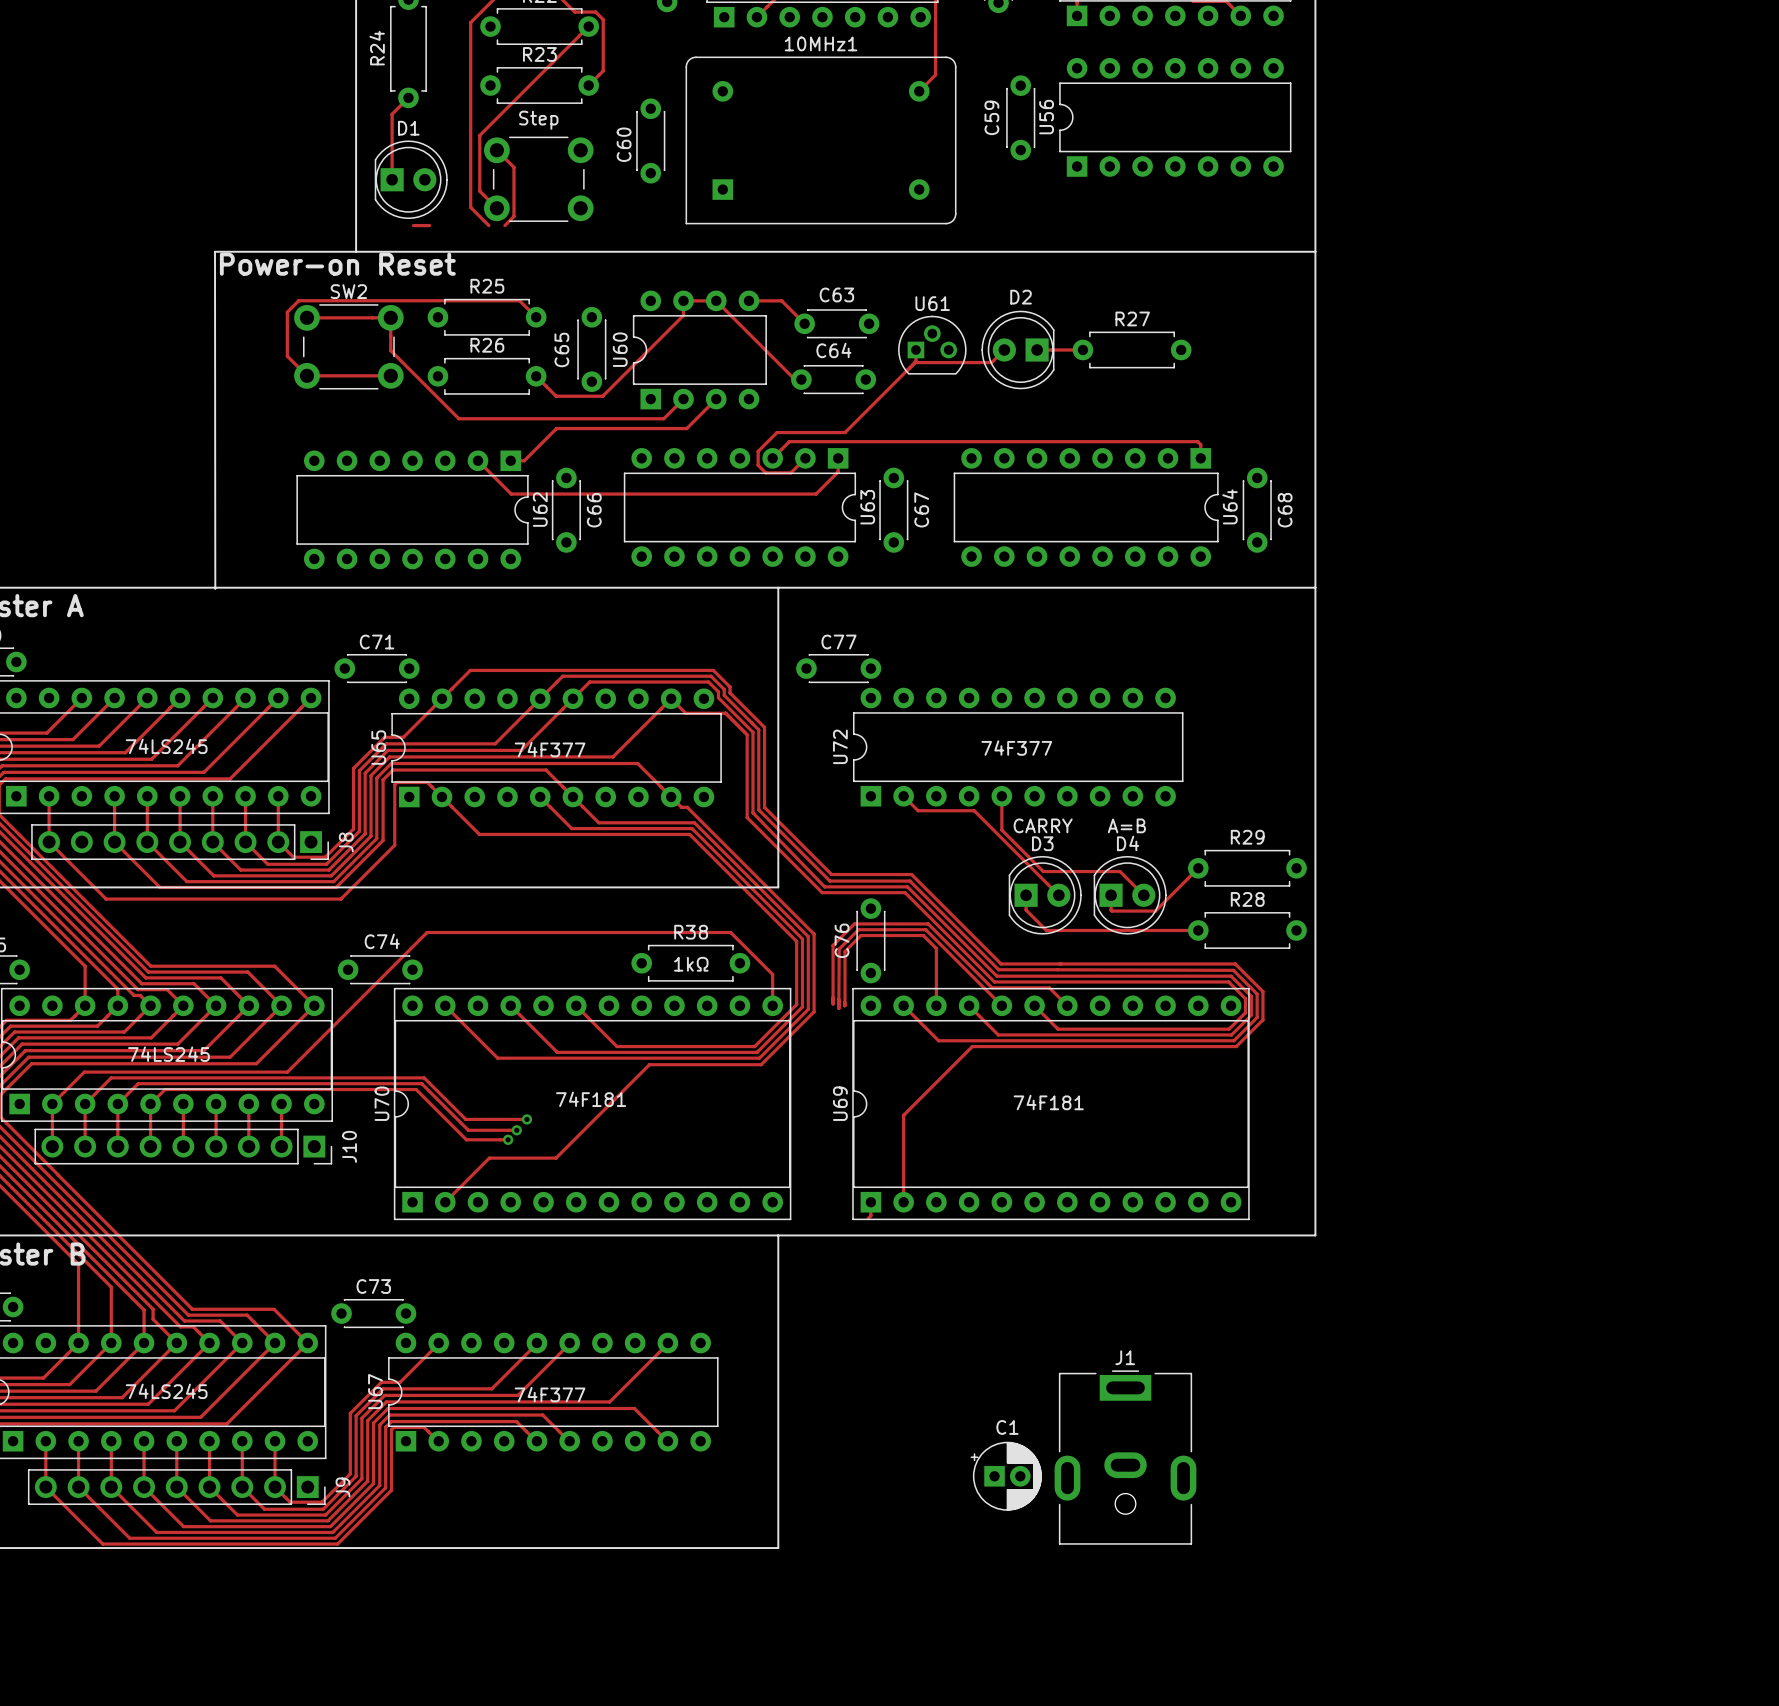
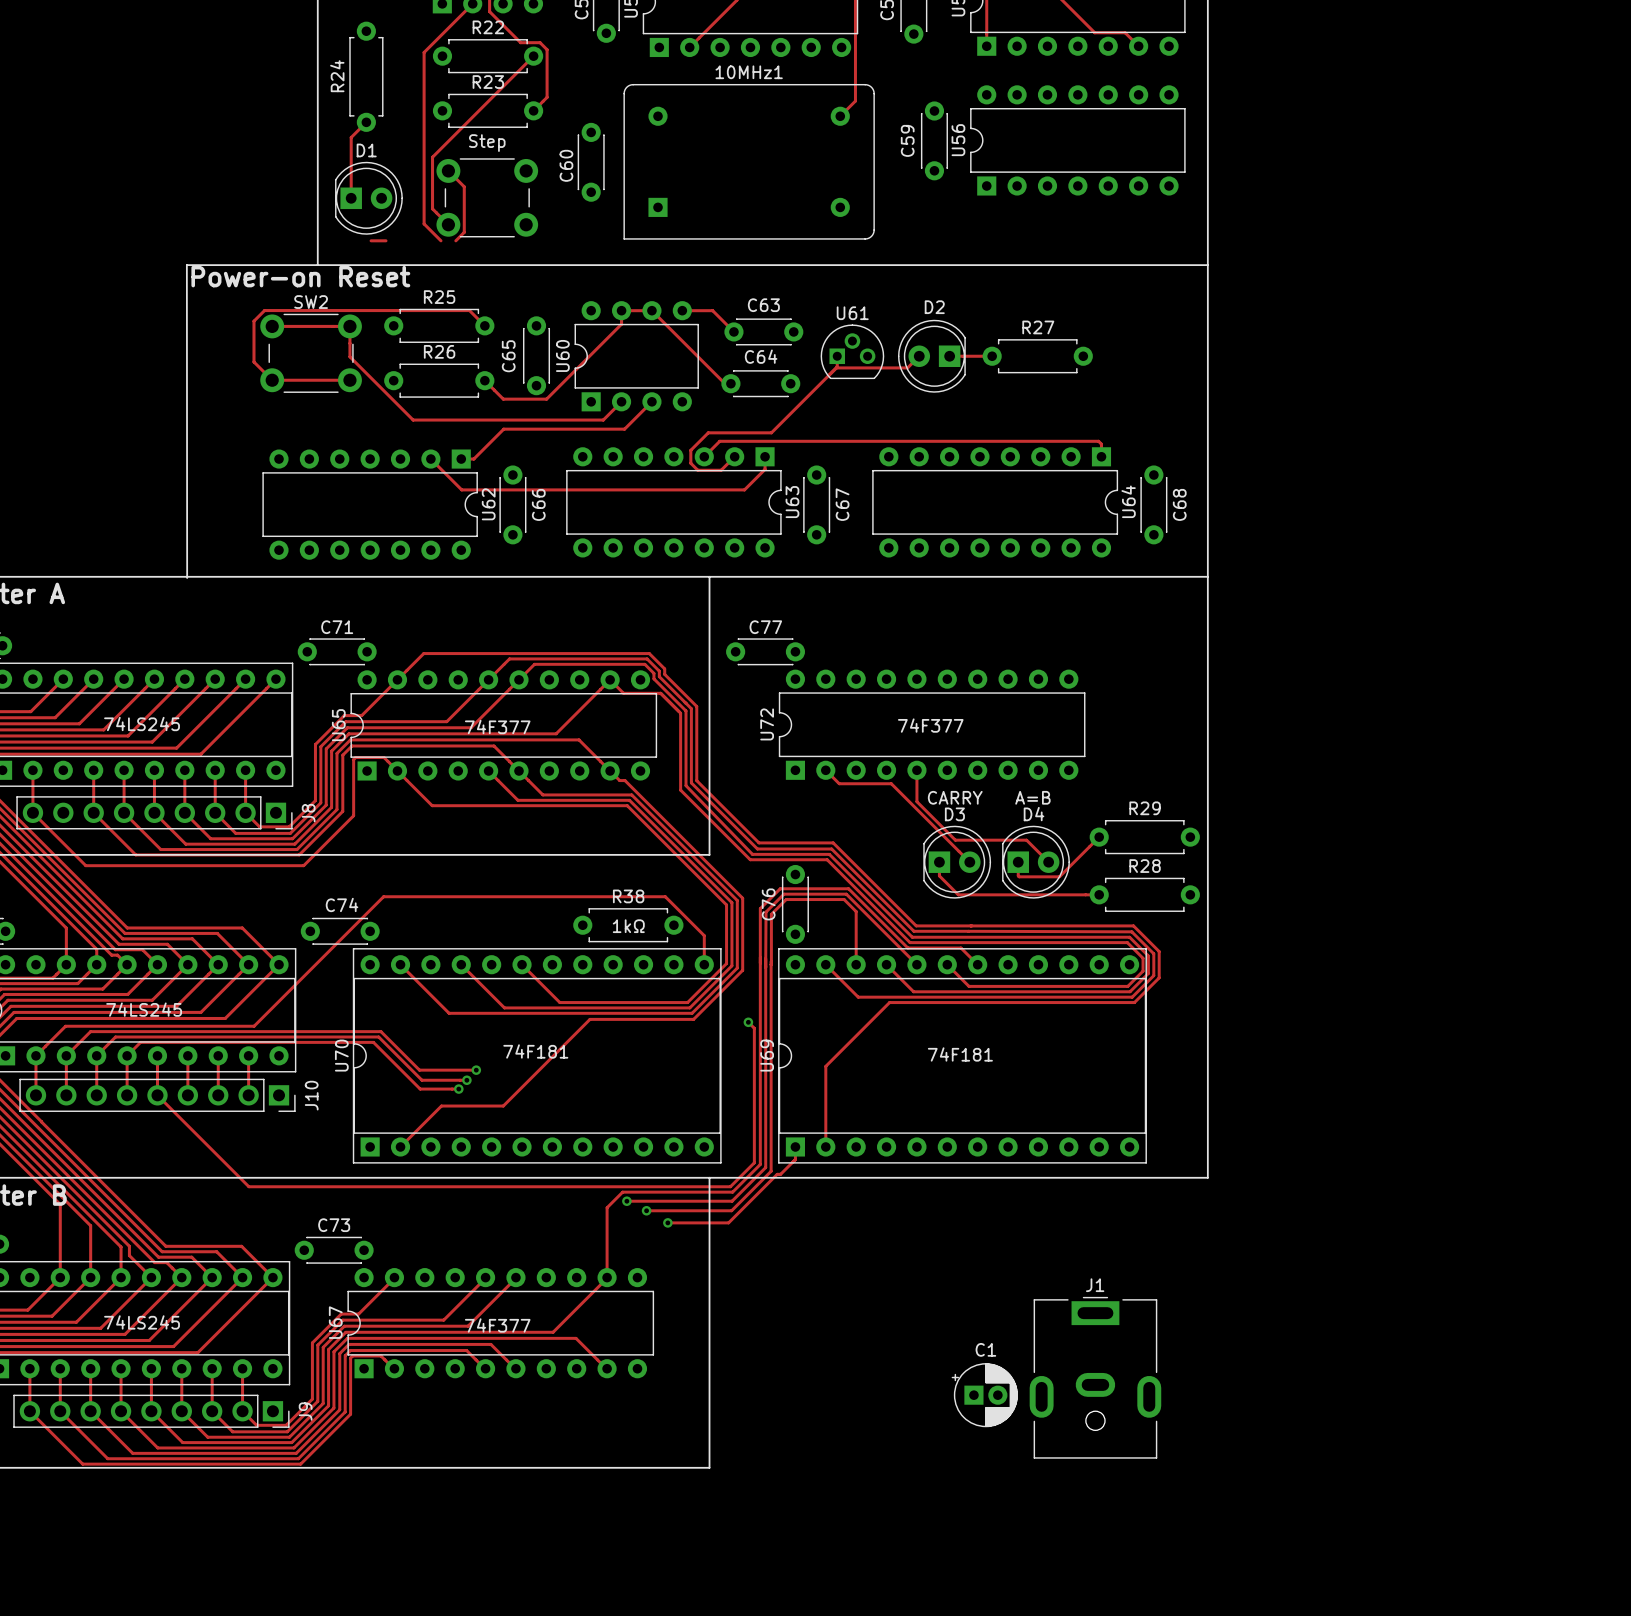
track: none -> (760, 963) (760, 1164) (732, 1192) (622, 1192) (607, 1207) (607, 1277)
track: none -> (771, 964) (771, 1171) (731, 1210) (646, 1210)
track: none -> (765, 967) (765, 1167) (732, 1201) (626, 1201)
track: none -> (748, 1022) (754, 1028) (754, 1162) (730, 1186) (248, 1186) (157, 1095)
via: none -> (748, 1022)
track: none -> (792, 1162) (780, 1174) (777, 1174) (728, 1222) (667, 1222)
via: none -> (626, 1201)
via: none -> (646, 1210)
via: none -> (667, 1222)
J1 position: (1125, 1457) -> (1095, 1377)
C1 position: (1006, 1476) -> (984, 1395)

